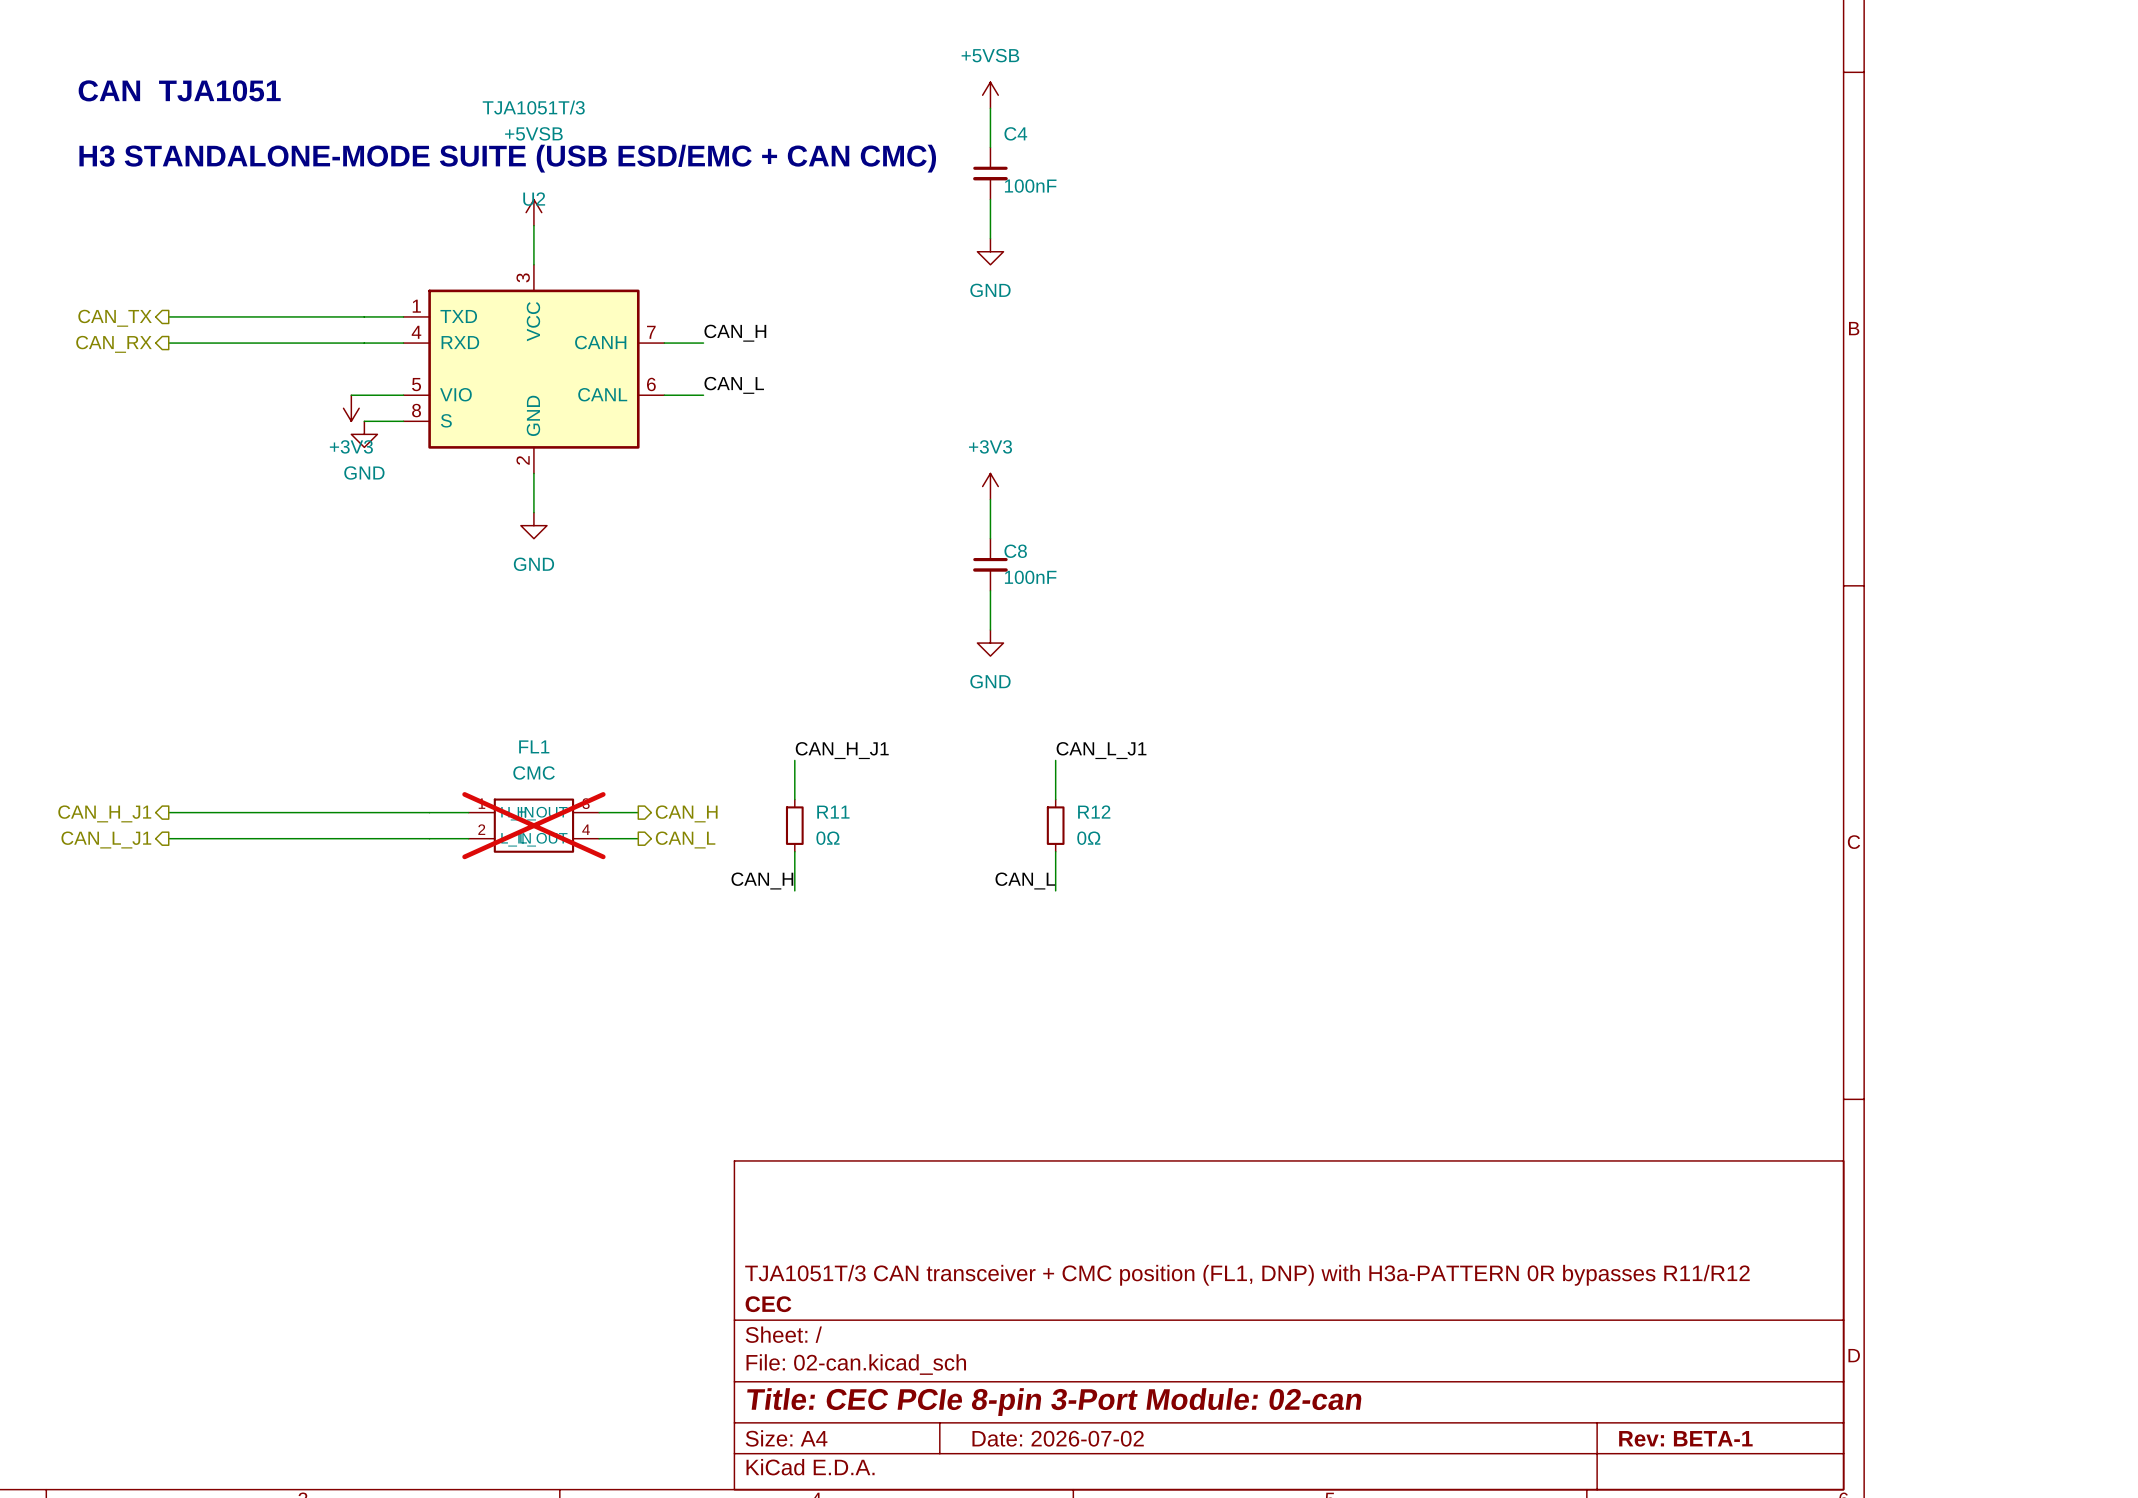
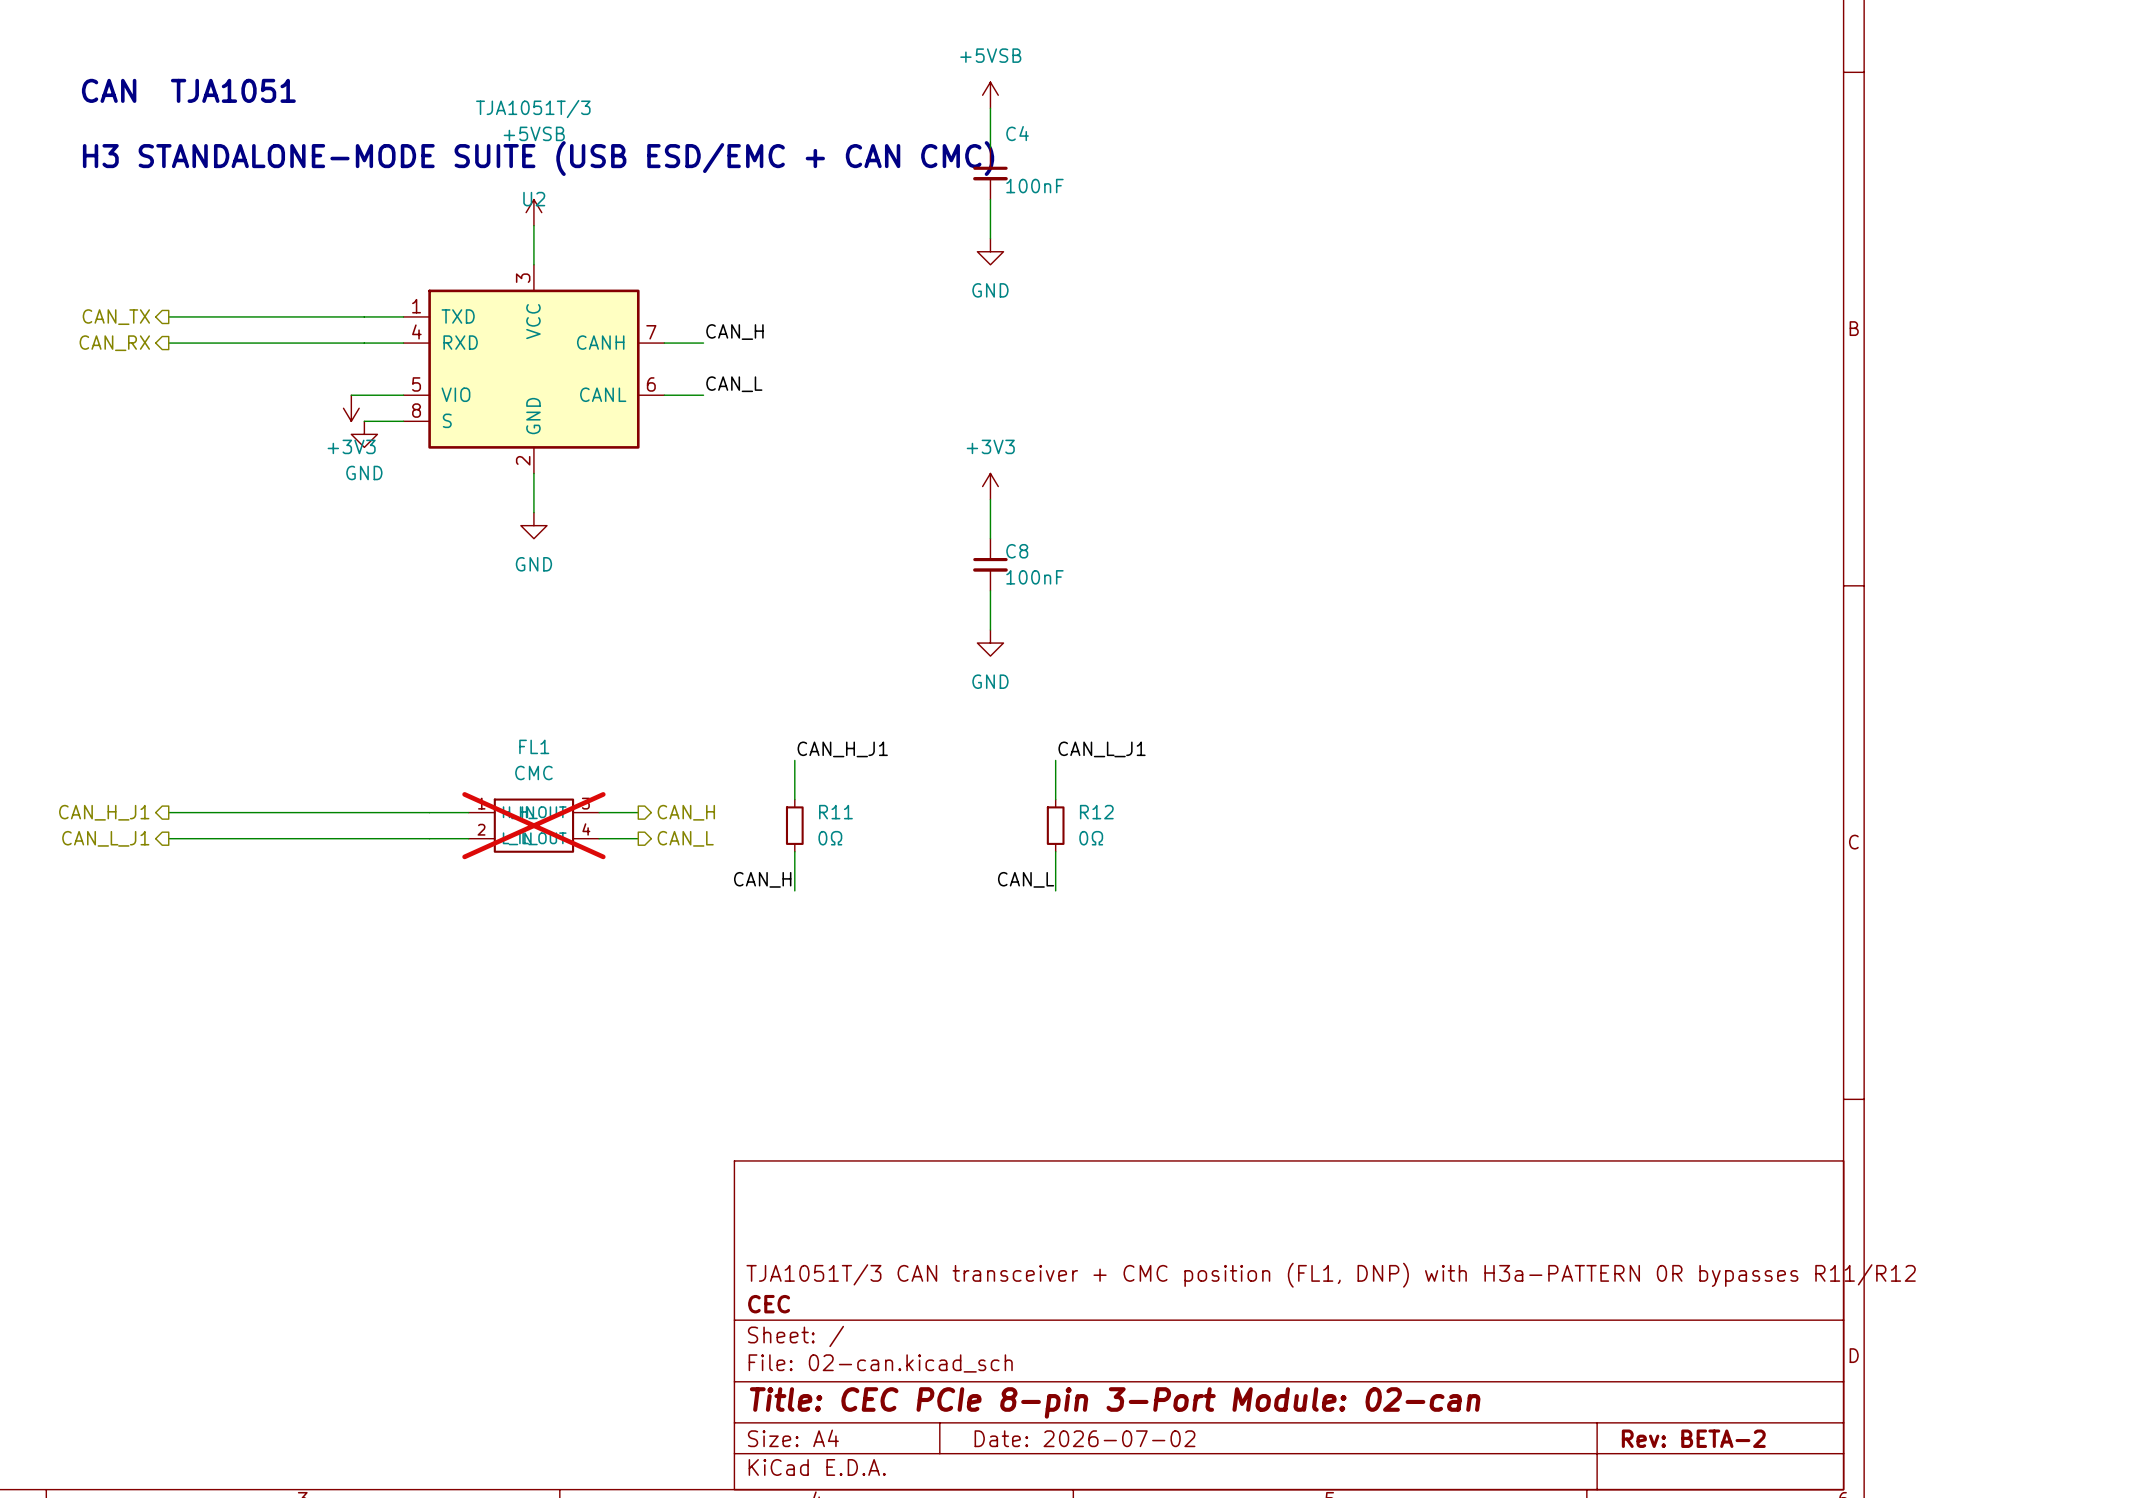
title block: Rev: BETA-1 (1685, 1438) -> Rev: BETA-2 (1693, 1438)

